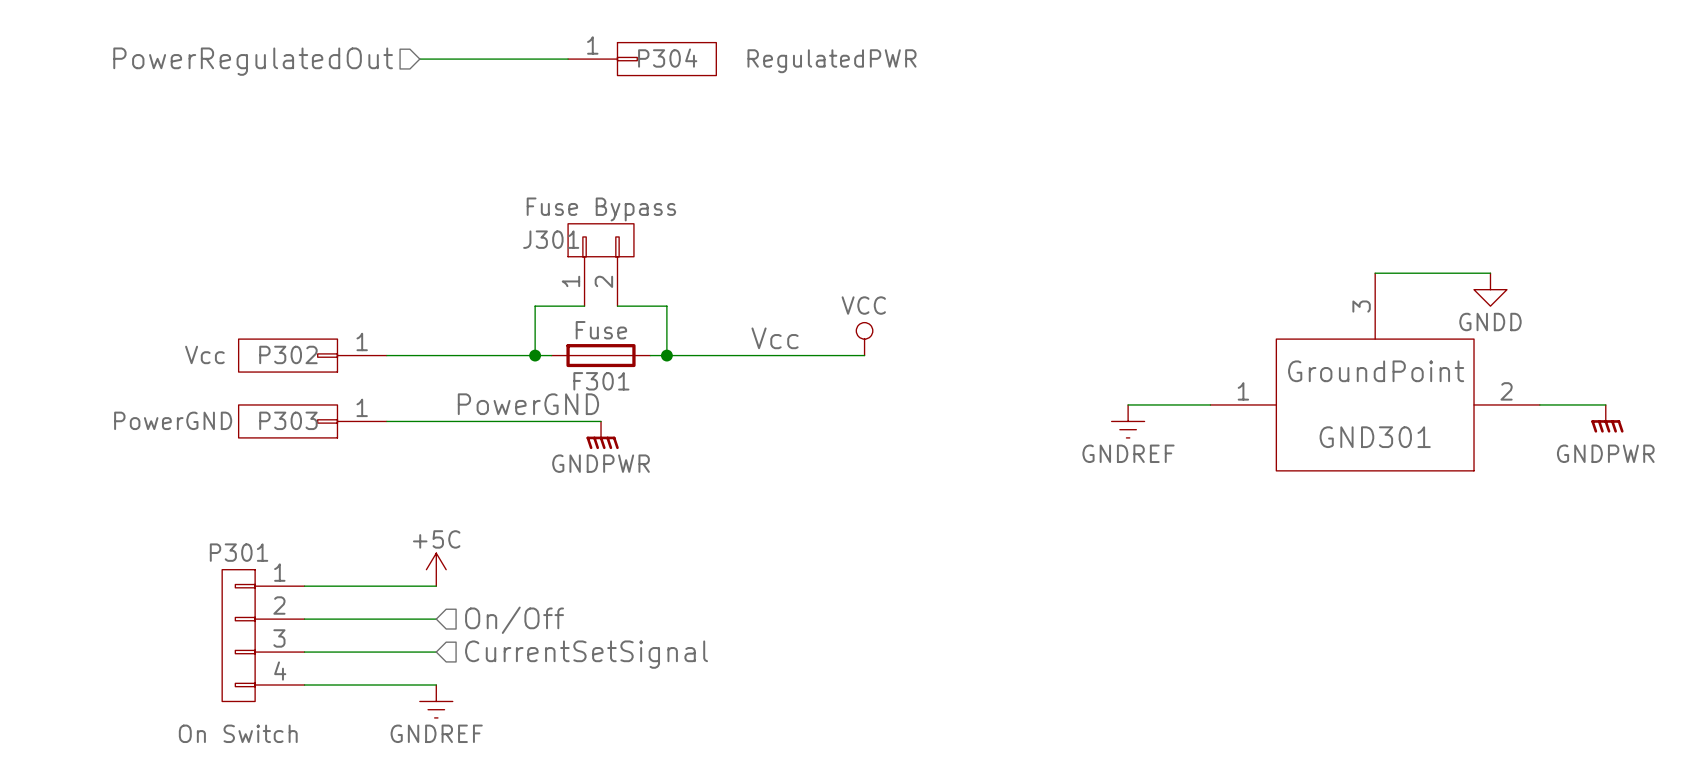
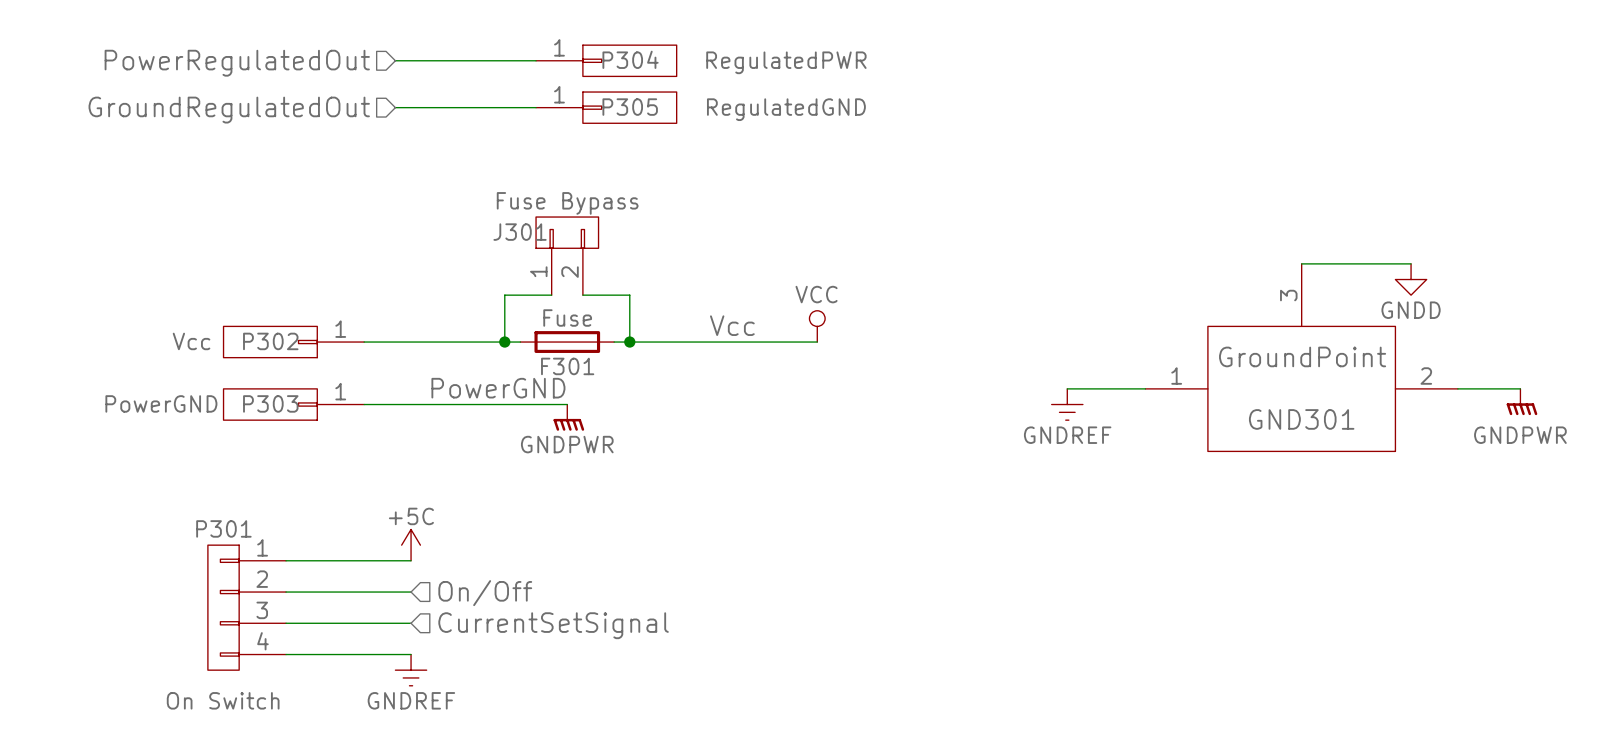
wire: none -> (395, 107) (536, 107)
P305: none -> RegulatedGND (606, 107)
hierarchical label: none -> GroundRegulatedOut (229, 110)

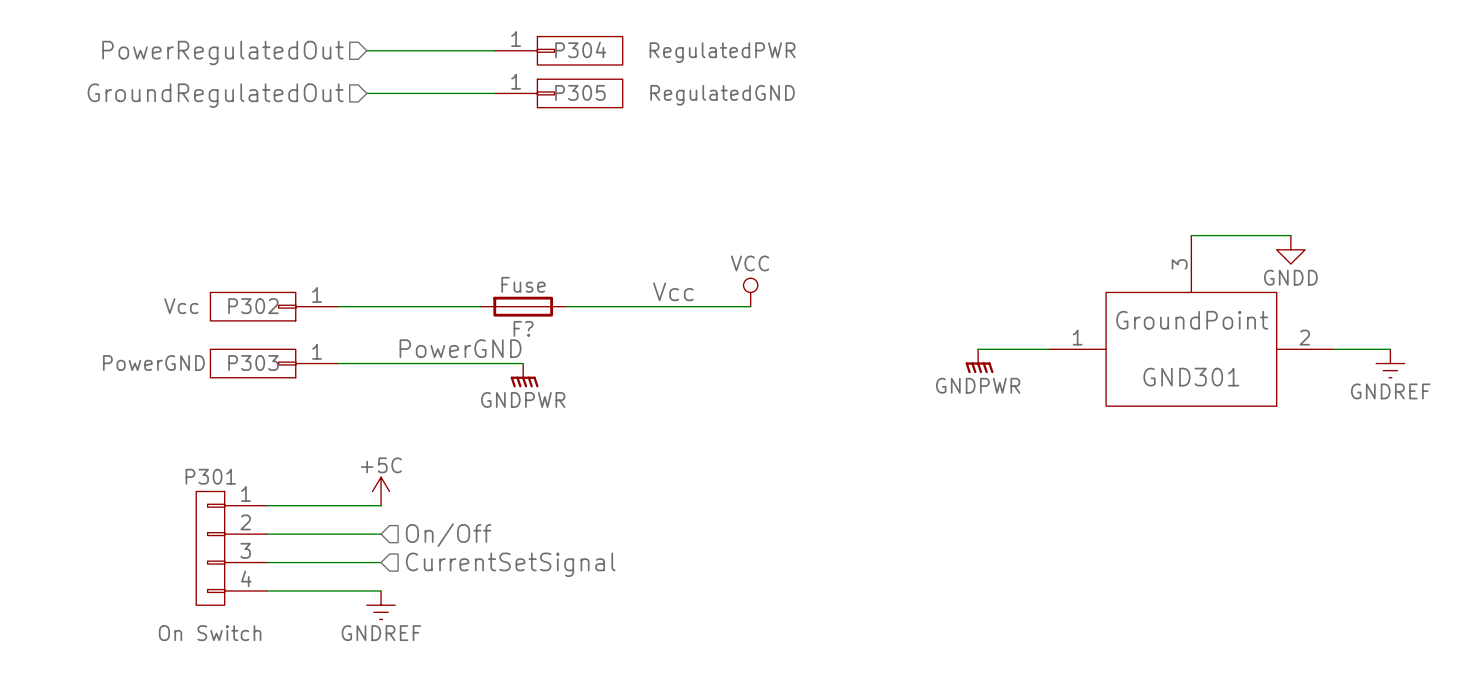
J301: Fuse Bypass (567, 256) -> none
wire: (551, 295) (504, 295) (504, 342) -> none
wire: (582, 295) (629, 295) (629, 342) -> none
junction: (504, 342) -> none
junction: (629, 342) -> none
F301 name: F301 (567, 366) -> F? (523, 328)
power symbol: GNDPWR (1521, 402) -> GNDREF (1390, 363)
power symbol: GNDREF (1067, 404) -> GNDPWR (979, 361)

